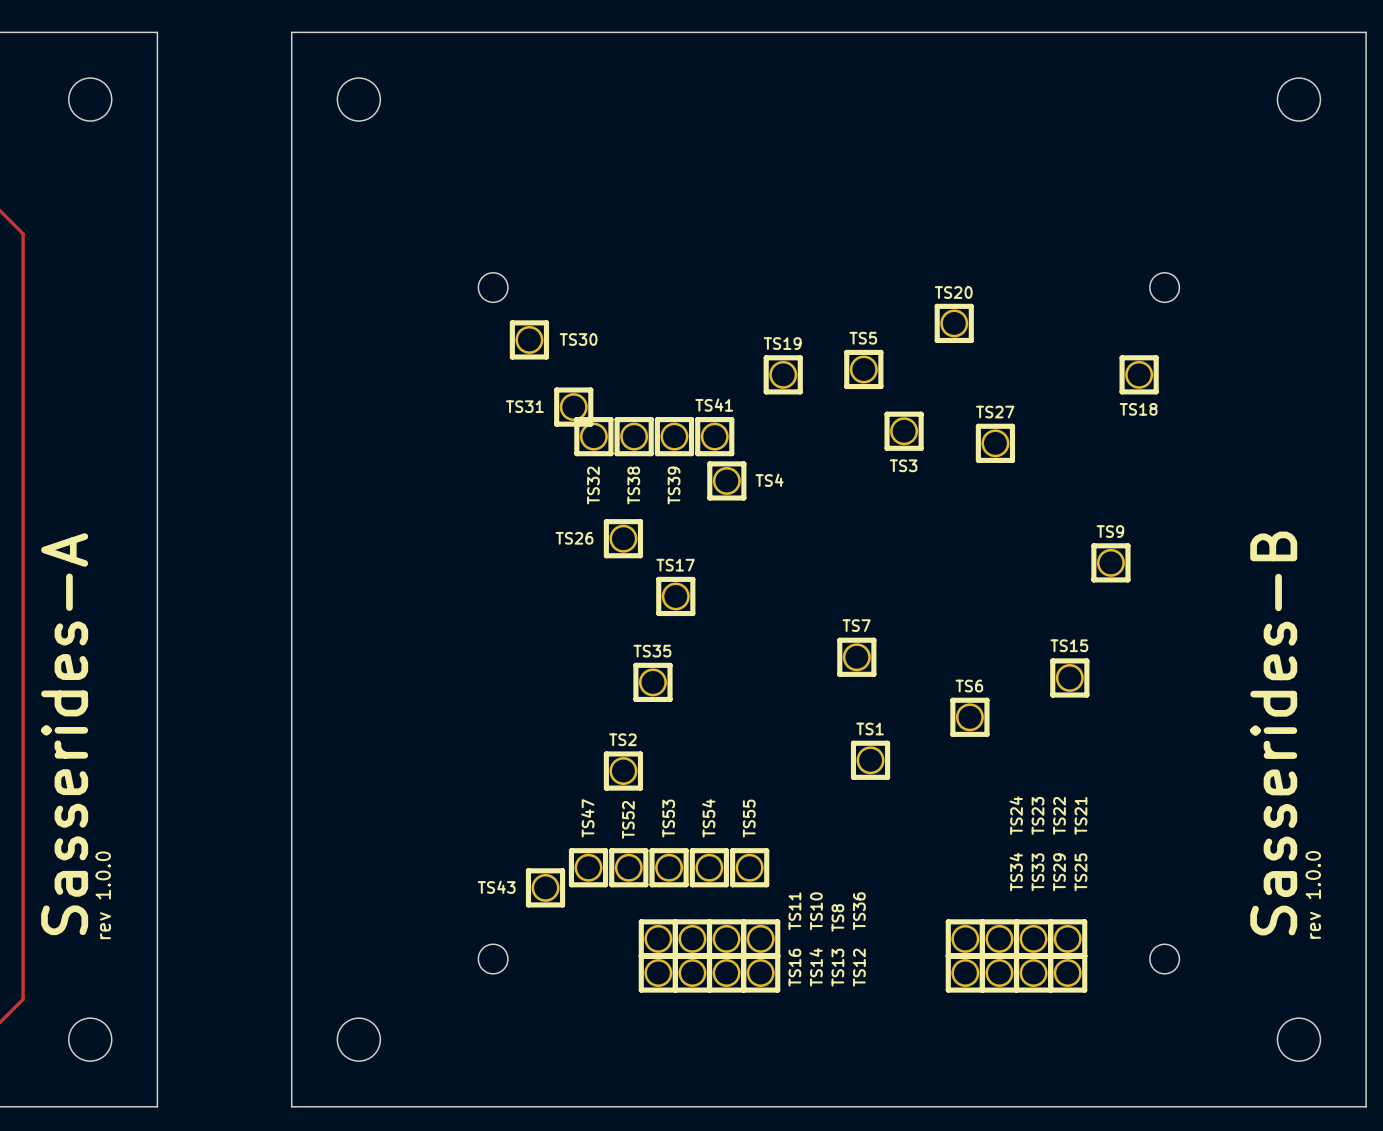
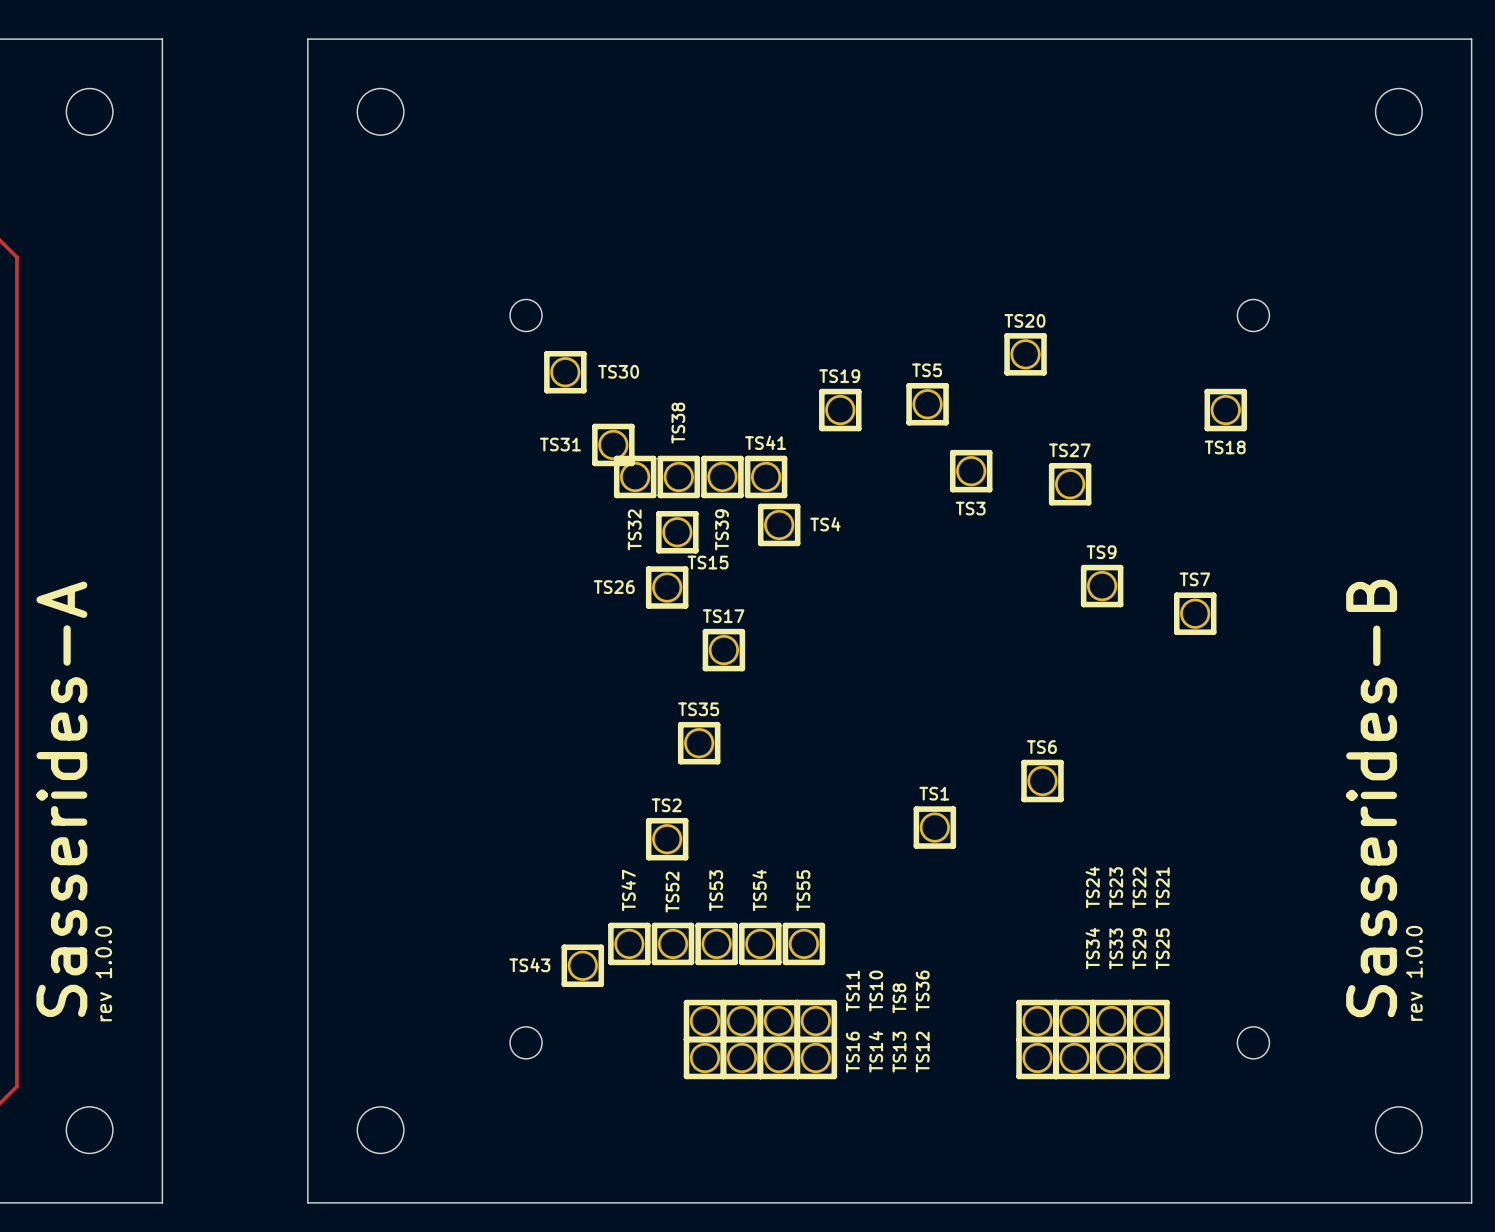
TS38 name position: TS38 (633, 485) -> TS38 (678, 423)
TS9 name: TS9 (1110, 531) -> TS7 (1194, 579)
TS9: none -> (1102, 586)
TS15 name position: TS15 (1069, 645) -> TS15 (708, 562)
TS7: (856, 657) -> none
TS15 position: (1069, 677) -> (677, 532)

